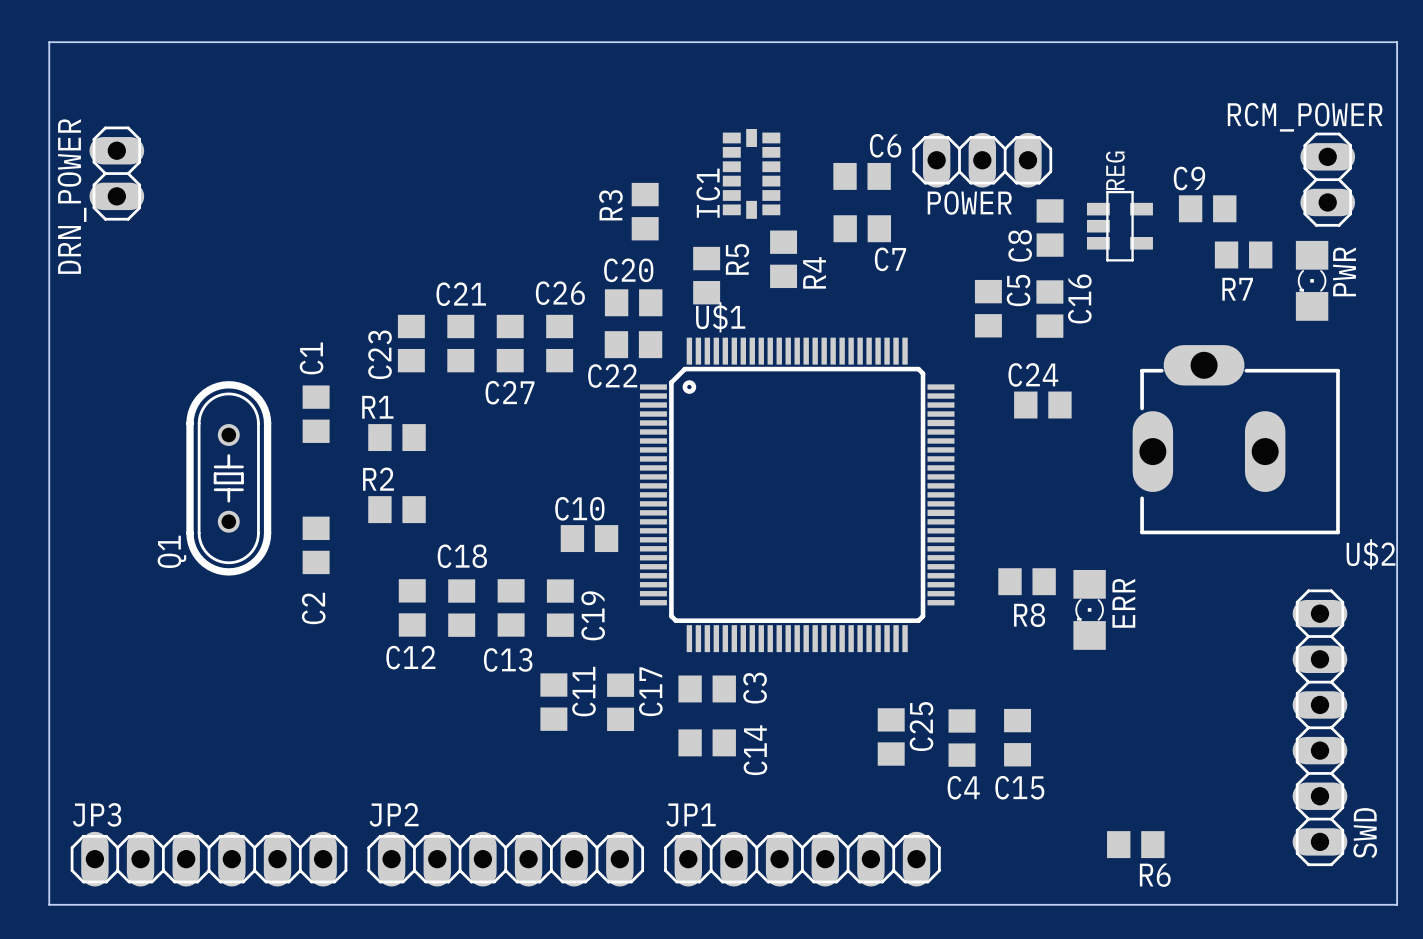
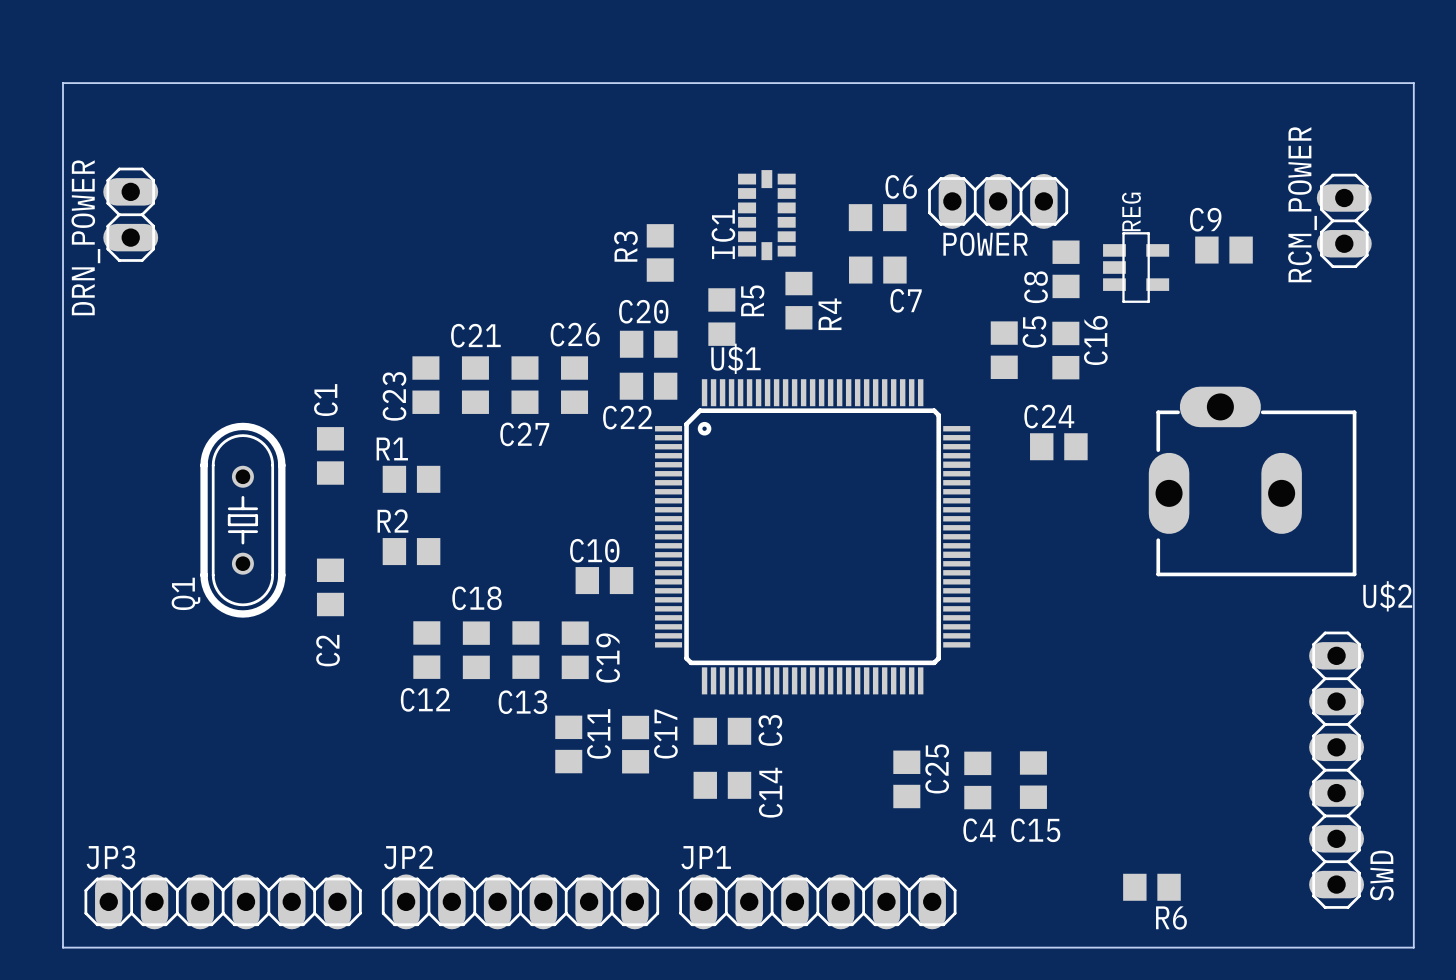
RCM_POWER name rotation: 0° (1305, 117) -> 90° counterclockwise (1302, 204)
R7: (1243, 254) -> none
PWR: (1312, 280) -> none
R8: (1027, 581) -> none
ERR: (1089, 609) -> none

